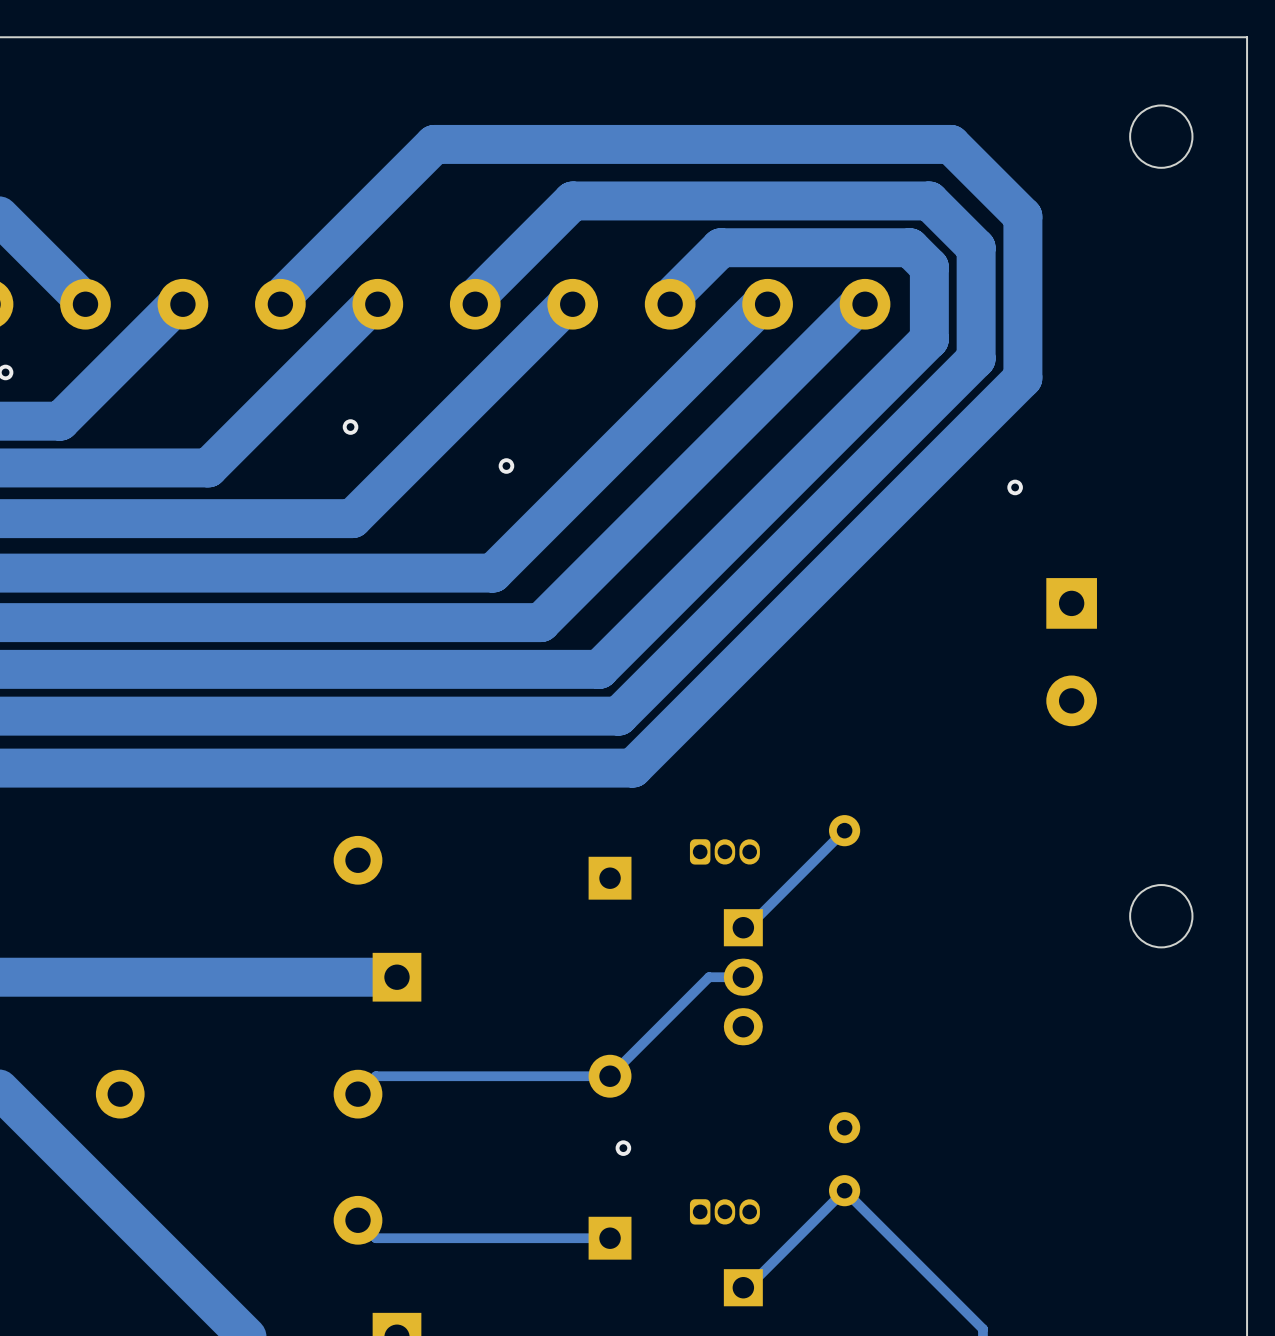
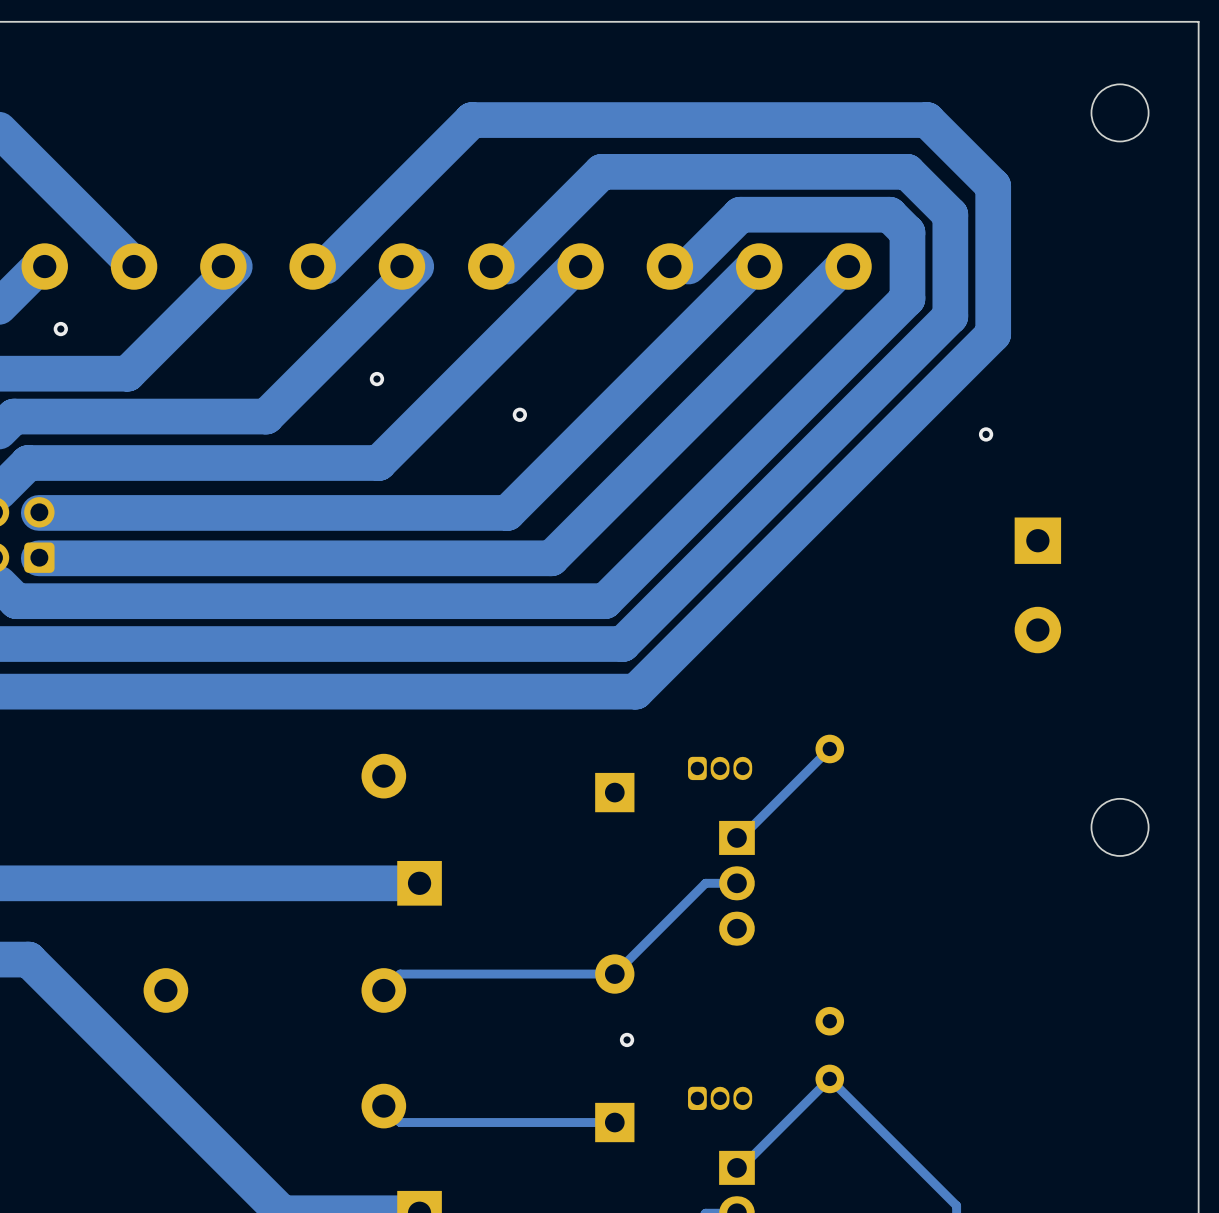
track: (454, 144) (434, 144) (278, 300) -> (471, 120) (325, 266)
track: (595, 200) (572, 200) (473, 300) -> (601, 171) (507, 266)
track: (746, 247) (720, 247) (668, 300) -> (740, 214) (688, 266)
track: (180, 300) (60, 421) -> (234, 266) (127, 373) (110, 373)
track: (375, 300) (208, 467) -> (416, 266) (266, 416) (246, 416)

